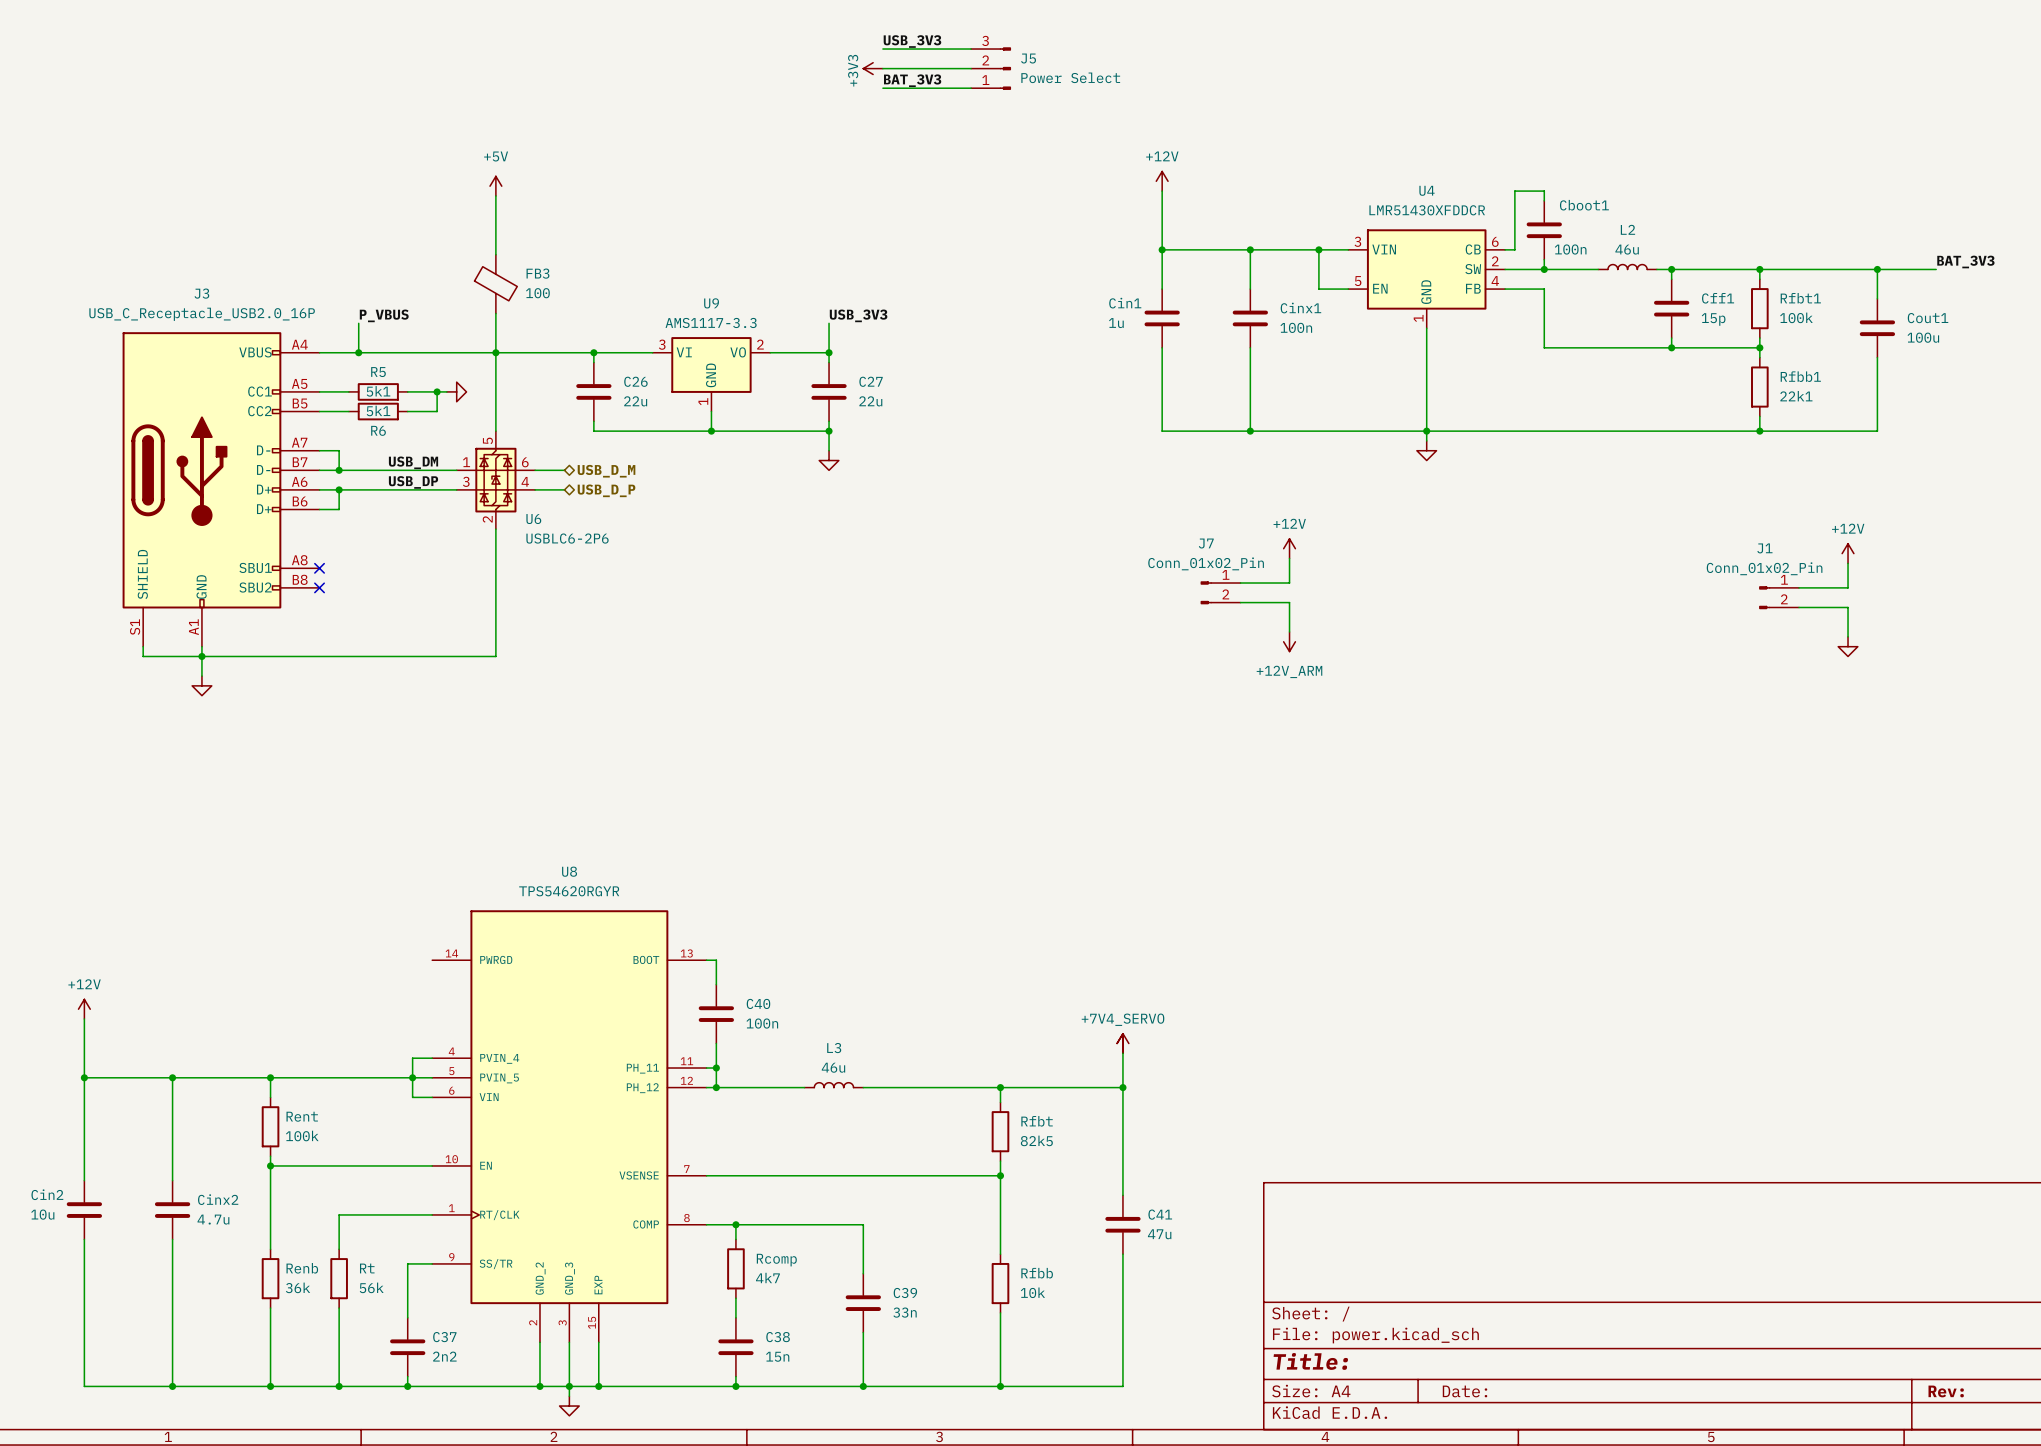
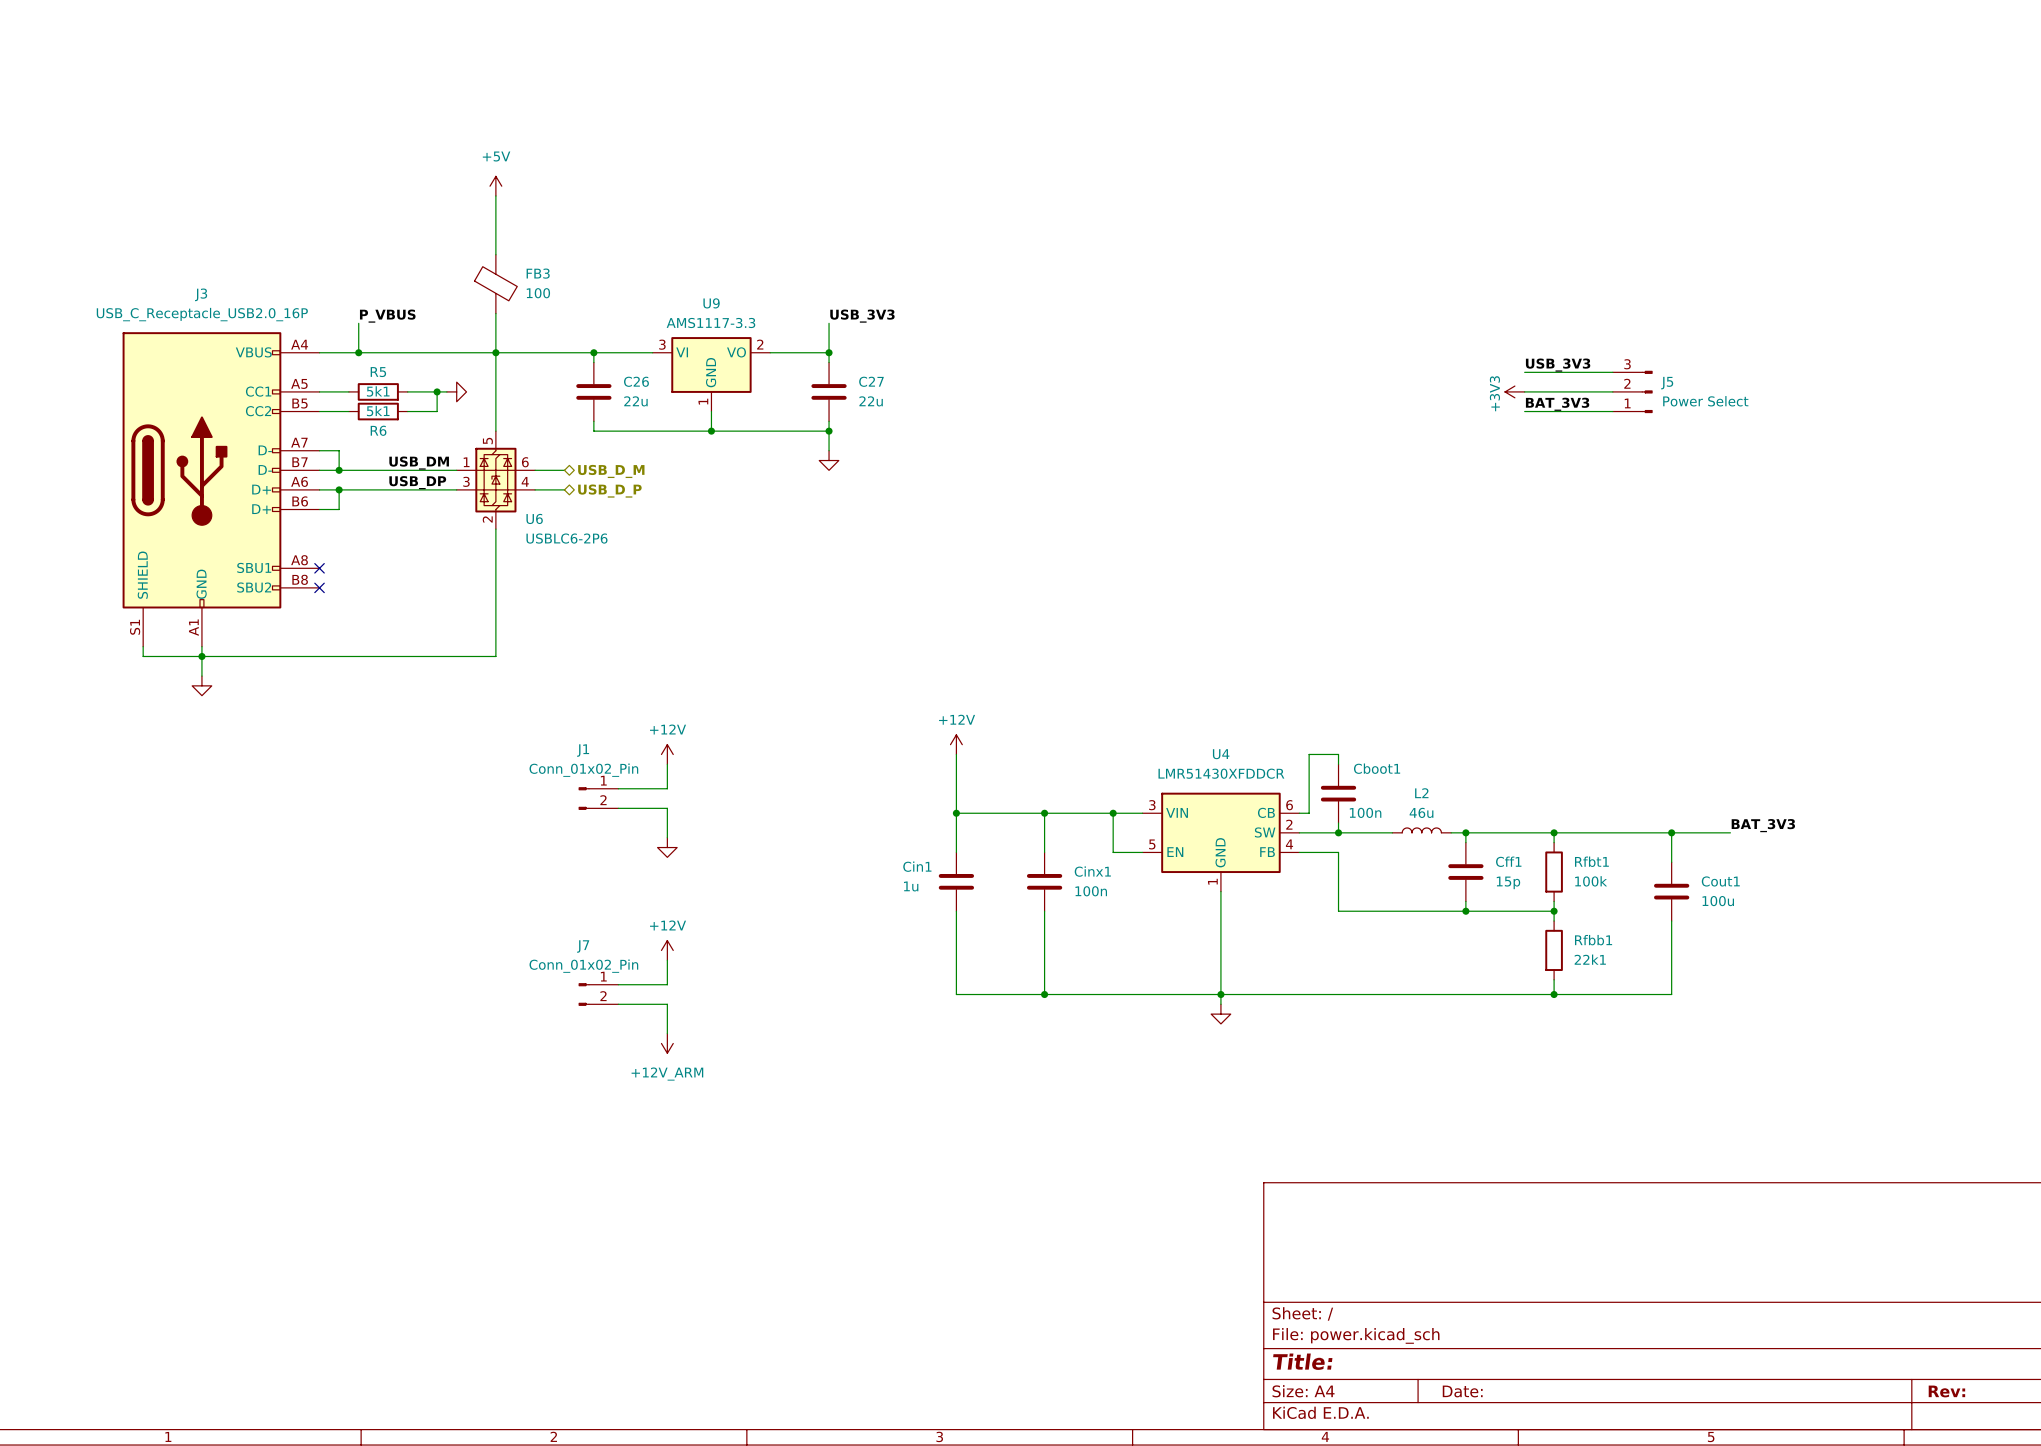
label: USB_3V3 (912, 41) -> none
wire: (882, 49) (971, 49) -> none
power symbol: +3V3 (873, 68) -> none
wire: (882, 68) (971, 68) -> none
J5 position: (990, 68) -> (1632, 391)
label: BAT_3V3 (912, 80) -> none
wire: (882, 88) (971, 88) -> none
power symbol: +12V (1162, 181) -> none
wire: (1162, 191) (1162, 289) -> none
wire: (1544, 200) (1544, 191) (1514, 191) (1514, 249) (1505, 249) -> none
Cboot1 position: (1544, 230) -> (1338, 793)
wire: (1162, 249) (1348, 249) -> none
junction: (1162, 249) -> none
wire: (1250, 249) (1250, 289) -> none
junction: (1250, 249) -> none
wire: (1318, 249) (1318, 289) (1348, 289) -> none
junction: (1318, 249) -> none
wire: (1544, 259) (1544, 269) -> none
label: BAT_3V3 (1965, 261) -> none
L2 position: (1627, 267) -> (1421, 830)
wire: (1505, 269) (1598, 269) -> none
junction: (1544, 269) -> none
wire: (1656, 269) (1936, 269) -> none
wire: (1671, 269) (1671, 279) -> none
junction: (1671, 269) -> none
wire: (1759, 269) (1759, 279) -> none
junction: (1759, 269) -> none
wire: (1877, 269) (1877, 298) -> none
junction: (1877, 269) -> none
U4 position: (1426, 278) -> (1220, 842)
wire: (1505, 289) (1544, 289) (1544, 347) (1759, 347) -> none
Cff1 position: (1671, 308) -> (1465, 872)
Rfbt1 position: (1759, 308) -> (1554, 872)
Cin1 position: (1162, 318) -> (956, 881)
Cinx1 position: (1250, 318) -> (1044, 881)
wire: (1426, 328) (1426, 440) -> none
Cout1 position: (1877, 328) -> (1671, 891)
wire: (1671, 338) (1671, 347) -> none
wire: (1759, 338) (1759, 357) -> none
wire: (1162, 347) (1162, 431) (1877, 431) (1877, 357) -> none
wire: (1250, 347) (1250, 431) -> none
junction: (1671, 347) -> none
junction: (1759, 347) -> none
label: none -> USB_3V3 (1558, 365)
wire: none -> (1524, 372) (1612, 372)
Rfbb1 position: (1759, 387) -> (1554, 950)
power symbol: none -> +3V3 (1514, 391)
wire: none -> (1524, 391) (1612, 391)
label: none -> BAT_3V3 (1557, 404)
wire: none -> (1524, 411) (1612, 411)
wire: (1759, 416) (1759, 431) -> none
junction: (1250, 431) -> none
junction: (1426, 431) -> none
junction: (1759, 431) -> none
power symbol: (1426, 450) -> none
power symbol: +12V (1289, 548) -> none
power symbol: +12V (1848, 553) -> none
wire: (1289, 558) (1289, 583) (1240, 583) -> none
wire: (1848, 563) (1848, 587) (1799, 587) -> none
J7 position: (1220, 592) -> (598, 994)
J1 position: (1779, 597) -> (598, 798)
wire: (1240, 602) (1289, 602) (1289, 631) -> none
wire: (1799, 607) (1848, 607) (1848, 636) -> none
power symbol: +12V_ARM (1289, 641) -> none
power symbol: (1848, 646) -> none
power symbol: none -> +12V (956, 744)
power symbol: none -> +12V (667, 754)
wire: none -> (956, 754) (956, 852)
wire: none -> (667, 764) (667, 788) (618, 788)
wire: none -> (1338, 764) (1338, 754) (1309, 754) (1309, 813) (1299, 813)
wire: none -> (618, 808) (667, 808) (667, 837)
wire: none -> (956, 813) (1142, 813)
junction: none -> (956, 813)
wire: none -> (1044, 813) (1044, 852)
junction: none -> (1044, 813)
wire: none -> (1113, 813) (1113, 852) (1142, 852)
junction: none -> (1113, 813)
wire: none -> (1338, 823) (1338, 832)
label: none -> BAT_3V3 (1763, 825)
wire: none -> (1299, 832) (1392, 832)
junction: none -> (1338, 832)
wire: none -> (1451, 832) (1730, 832)
wire: none -> (1465, 832) (1465, 842)
junction: none -> (1465, 832)
wire: none -> (1554, 832) (1554, 842)
junction: none -> (1554, 832)
wire: none -> (1671, 832) (1671, 862)
junction: none -> (1671, 832)
power symbol: none -> (667, 847)
wire: none -> (1299, 852) (1338, 852) (1338, 911) (1554, 911)
wire: none -> (1220, 891) (1220, 1004)
wire: none -> (1465, 901) (1465, 911)
wire: none -> (1554, 901) (1554, 921)
wire: none -> (956, 911) (956, 994) (1671, 994) (1671, 921)
wire: none -> (1044, 911) (1044, 994)
junction: none -> (1465, 911)
junction: none -> (1554, 911)
power symbol: none -> +12V (667, 950)
wire: (706, 960) (716, 960) (716, 984) -> none
wire: none -> (1554, 979) (1554, 994)
junction: none -> (1044, 994)
junction: none -> (1220, 994)
junction: none -> (1554, 994)
power symbol: +12V (84, 1009) -> none
C40: 100n (716, 1014) -> none
power symbol: none -> (1220, 1014)
wire: (84, 1019) (84, 1180) -> none
power symbol: none -> +12V_ARM (667, 1043)
wire: (716, 1043) (716, 1087) -> none
power symbol: +7V4_SERVO (1122, 1043) -> none
wire: (1122, 1053) (1122, 1195) -> none
wire: (432, 1058) (412, 1058) (412, 1097) (432, 1097) -> none
wire: (706, 1068) (716, 1068) -> none
junction: (716, 1068) -> none
wire: (84, 1077) (432, 1077) -> none
junction: (84, 1077) -> none
wire: (172, 1077) (172, 1180) -> none
junction: (172, 1077) -> none
wire: (270, 1077) (270, 1097) -> none
junction: (270, 1077) -> none
junction: (412, 1077) -> none
L3: 46u (833, 1085) -> none
wire: (706, 1087) (804, 1087) -> none
junction: (716, 1087) -> none
wire: (863, 1087) (1122, 1087) -> none
wire: (1000, 1087) (1000, 1102) -> none
junction: (1000, 1087) -> none
junction: (1122, 1087) -> none
Rent: 100k (270, 1126) -> none
U8: TPS54620RGYR (569, 1126) -> none
Rfbt: 82k5 (1000, 1131) -> none
wire: (270, 1156) (270, 1249) -> none
wire: (1000, 1161) (1000, 1254) -> none
wire: (270, 1165) (432, 1165) -> none
junction: (270, 1165) -> none
wire: (706, 1175) (1000, 1175) -> none
junction: (1000, 1175) -> none
Cin2: 10u (84, 1210) -> none
Cinx2: 4.7u (172, 1210) -> none
wire: (432, 1214) (339, 1214) (339, 1249) -> none
wire: (706, 1224) (863, 1224) (863, 1273) -> none
wire: (735, 1224) (735, 1239) -> none
junction: (735, 1224) -> none
C41: 47u (1122, 1224) -> none
wire: (84, 1239) (84, 1386) (1122, 1386) (1122, 1254) -> none
wire: (172, 1239) (172, 1386) -> none
wire: (432, 1263) (407, 1263) (407, 1317) -> none
Rcomp: 4k7 (735, 1268) -> none
Renb: 36k (270, 1278) -> none
Rt: 56k (339, 1278) -> none
Rfbb: 10k (1000, 1283) -> none
wire: (735, 1298) (735, 1317) -> none
C39: 33n (863, 1303) -> none
wire: (270, 1308) (270, 1386) -> none
wire: (339, 1308) (339, 1386) -> none
wire: (1000, 1312) (1000, 1386) -> none
wire: (863, 1332) (863, 1386) -> none
wire: (539, 1342) (539, 1386) -> none
wire: (569, 1342) (569, 1396) -> none
wire: (598, 1342) (598, 1386) -> none
C37: 2n2 (407, 1347) -> none
C38: 15n (735, 1347) -> none
wire: (407, 1376) (407, 1386) -> none
wire: (735, 1376) (735, 1386) -> none
junction: (172, 1386) -> none
junction: (270, 1386) -> none
junction: (339, 1386) -> none
junction: (407, 1386) -> none
junction: (539, 1386) -> none
junction: (569, 1386) -> none
junction: (598, 1386) -> none
junction: (735, 1386) -> none
junction: (863, 1386) -> none
junction: (1000, 1386) -> none
power symbol: (569, 1406) -> none

